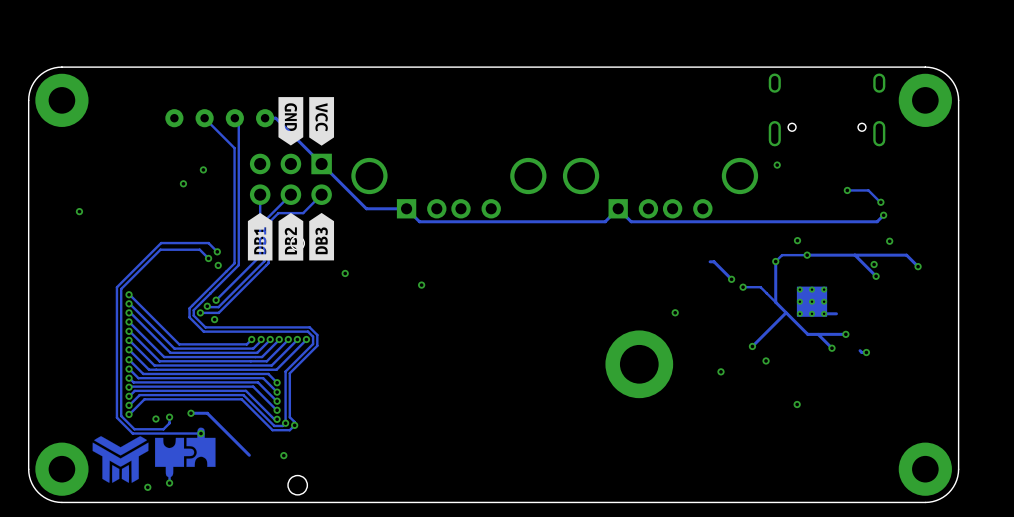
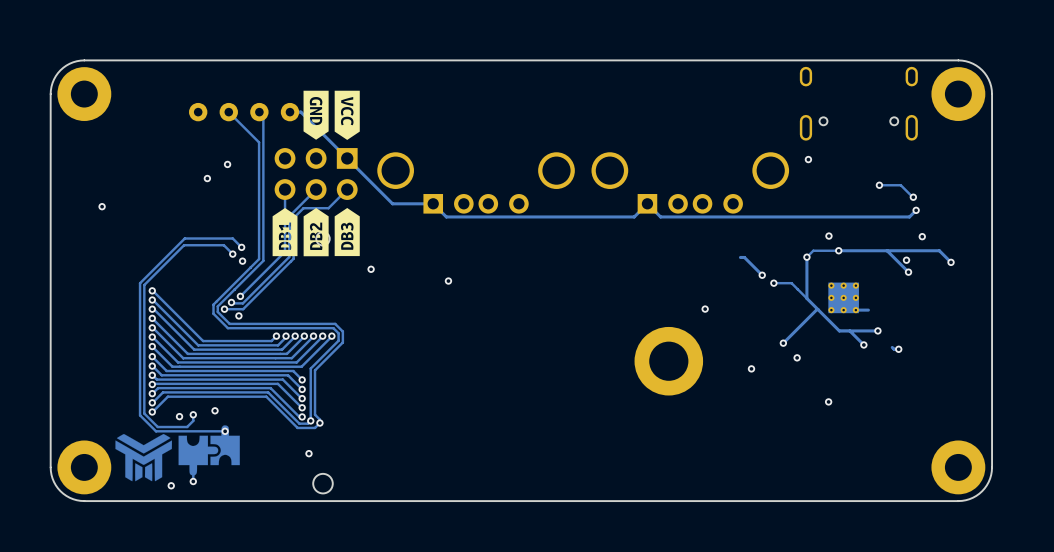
track: (191, 413) (207, 413) (249, 455) -> none

